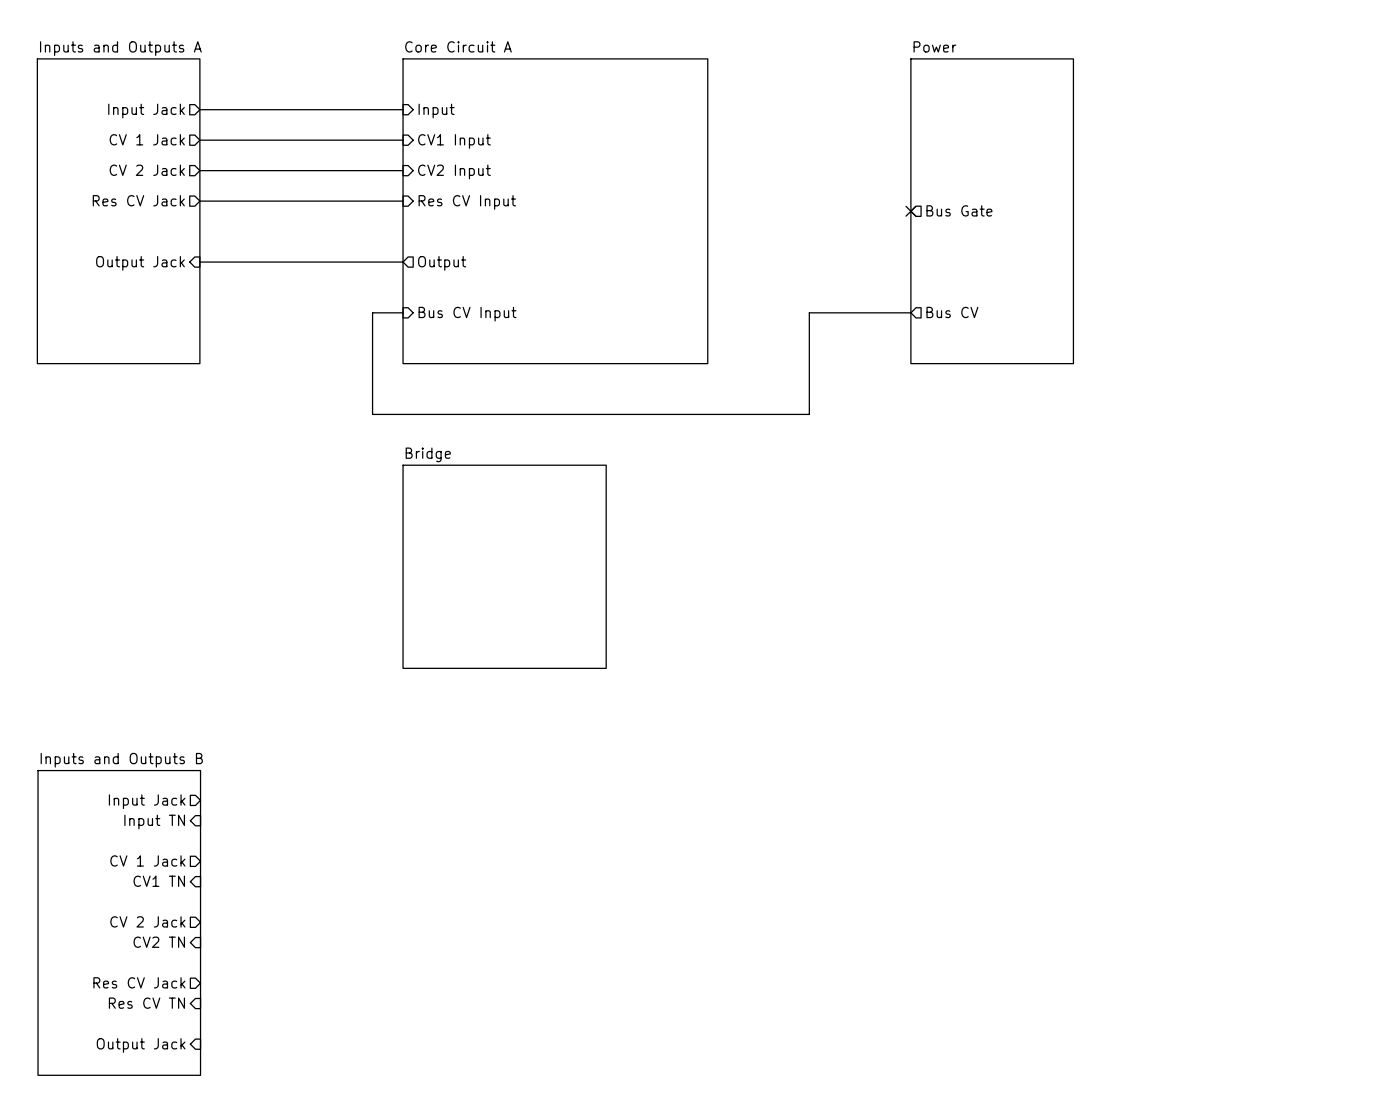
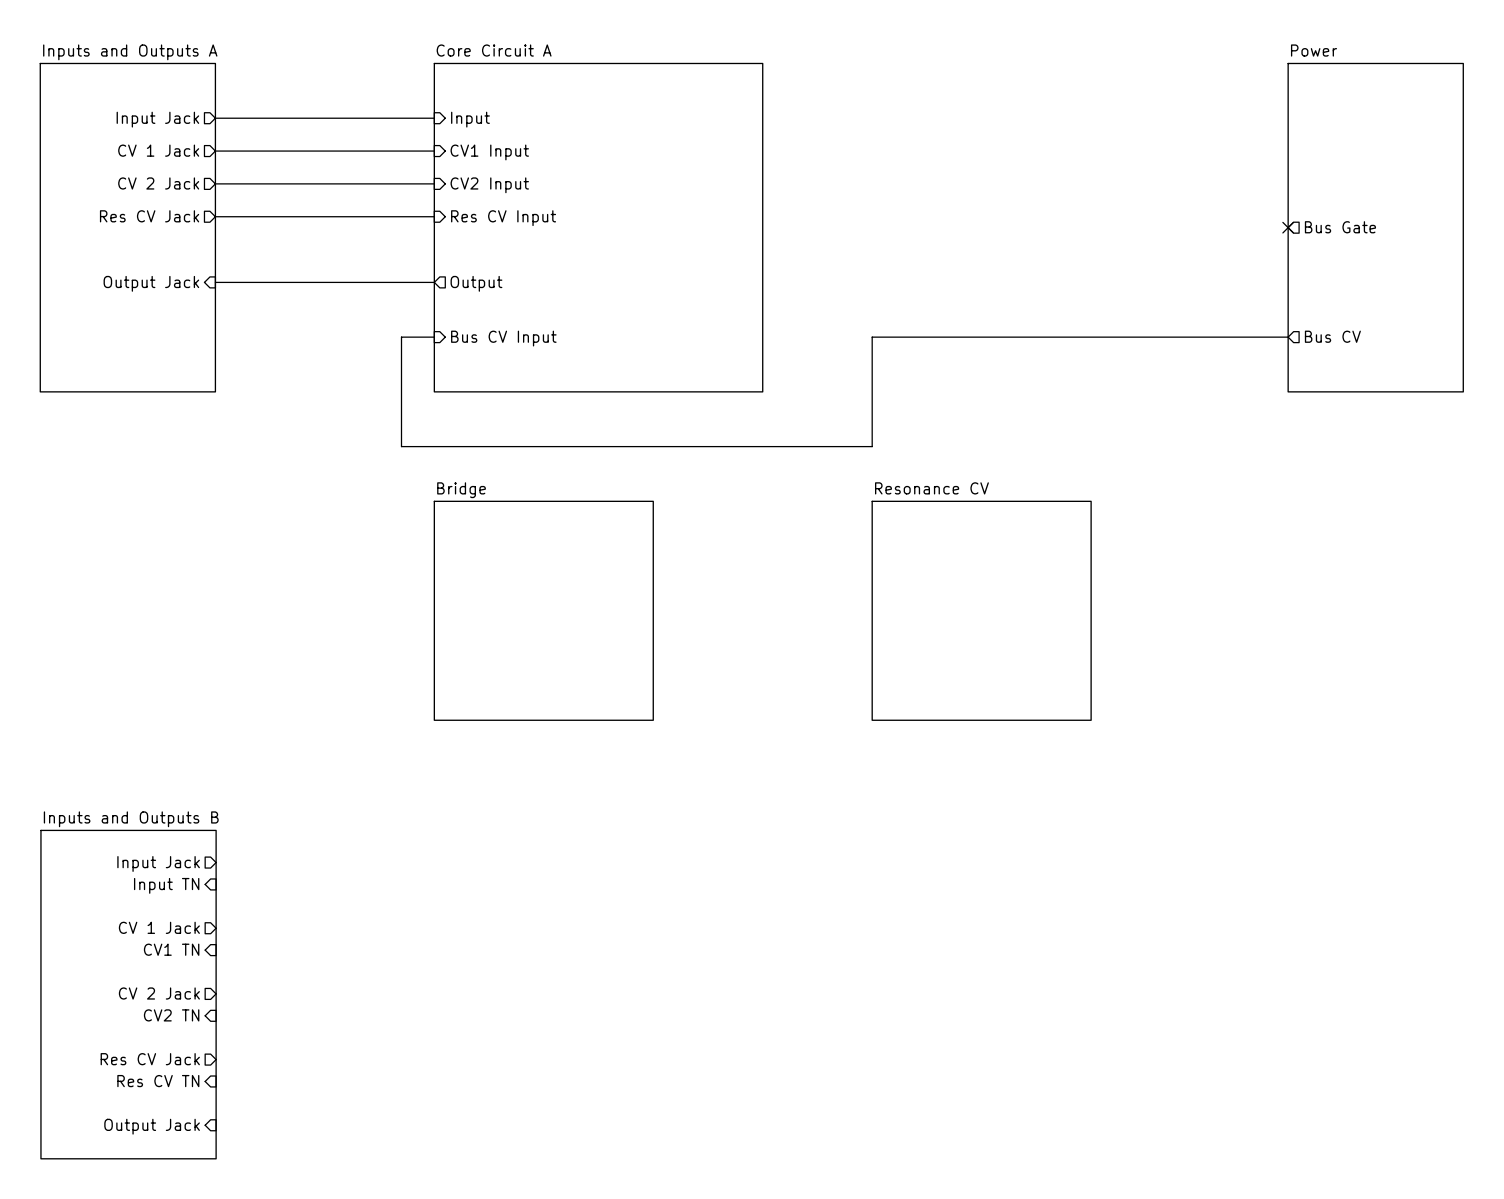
sheet pin: Bus Gate (959, 210) -> none
sheet pin: none -> Bus Gate (1340, 227)
no-connect mark: (910, 211) -> none
sheet Power: (992, 211) -> none
no-connect mark: none -> (1288, 227)
sheet Power: none -> (1375, 227)
wire: none -> (981, 337) (1288, 337)
sheet pin: Bus CV (952, 312) -> none
sheet pin: none -> Bus CV (1332, 336)
sheet Resonance CV: none -> (981, 610)

